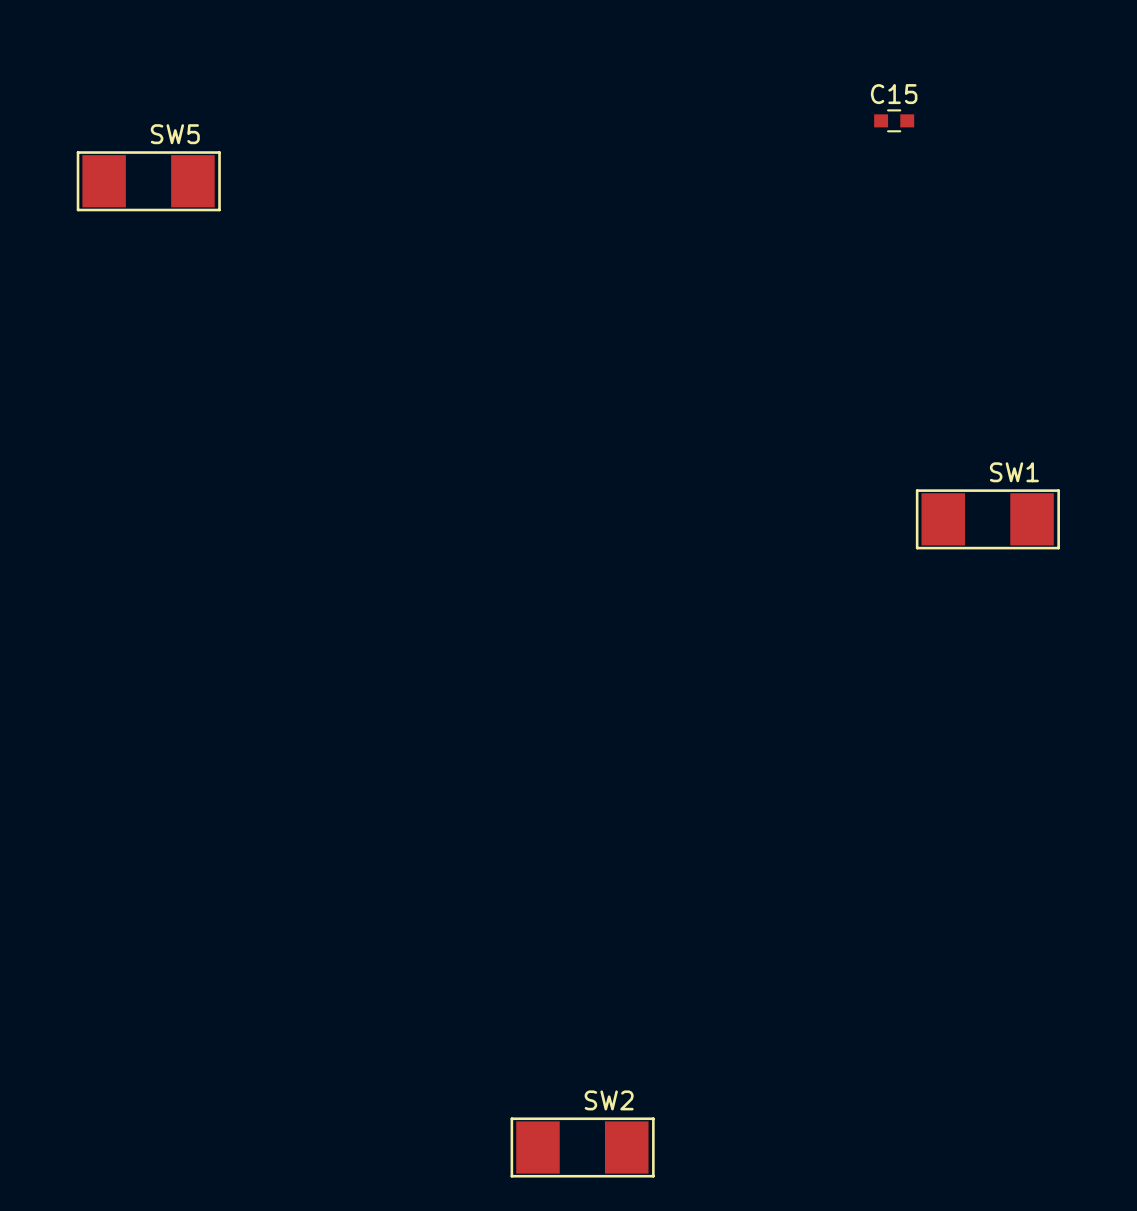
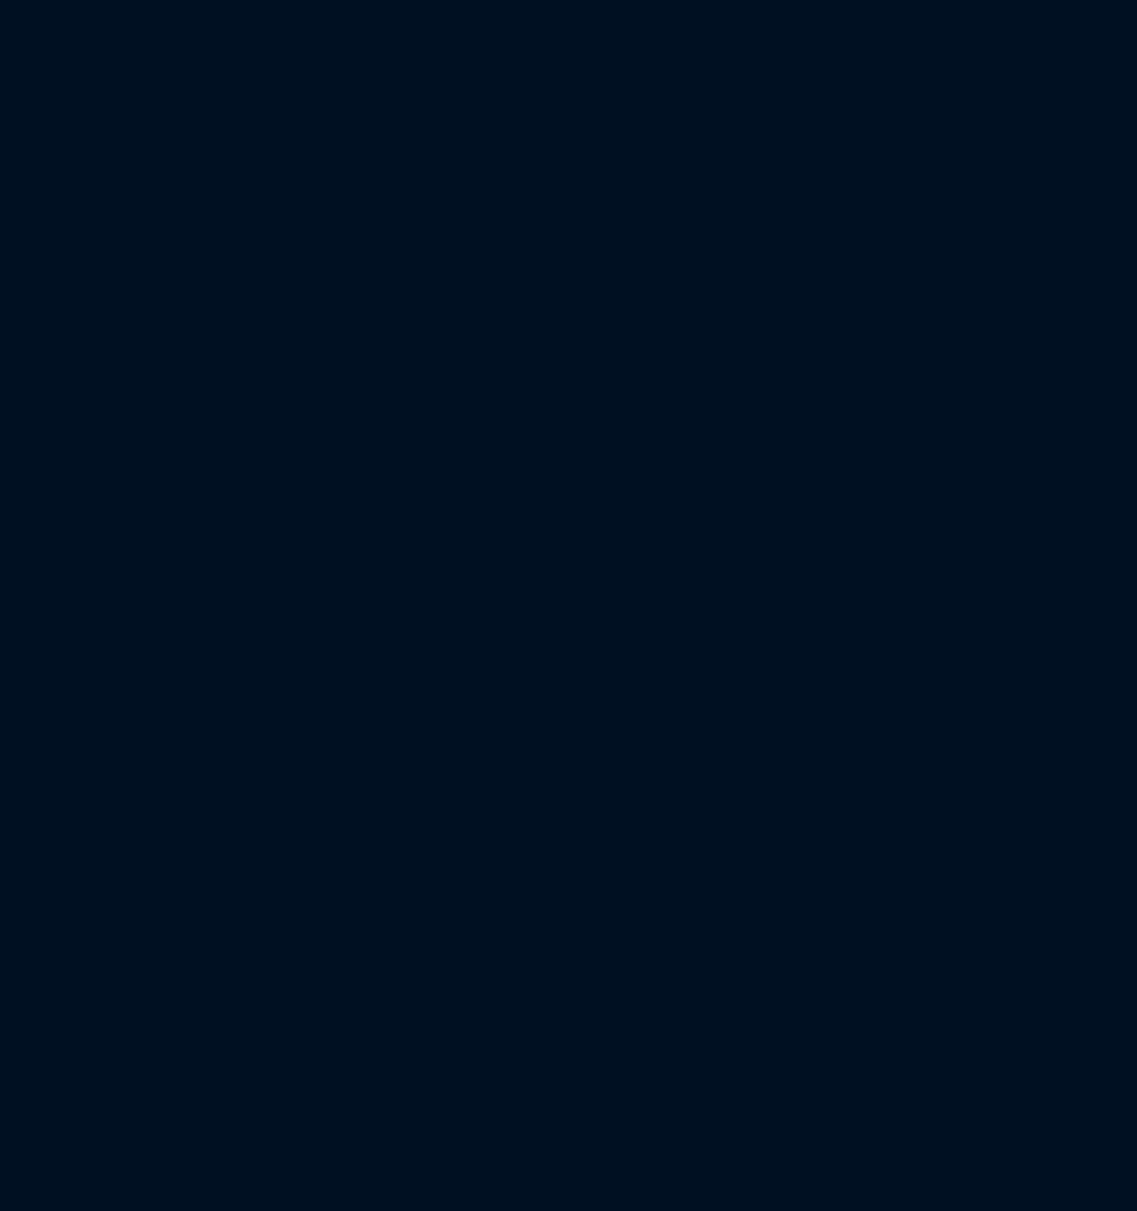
C15: (894, 120) -> none
SW5: (148, 181) -> none
SW1: (987, 519) -> none
SW2: (582, 1147) -> none

